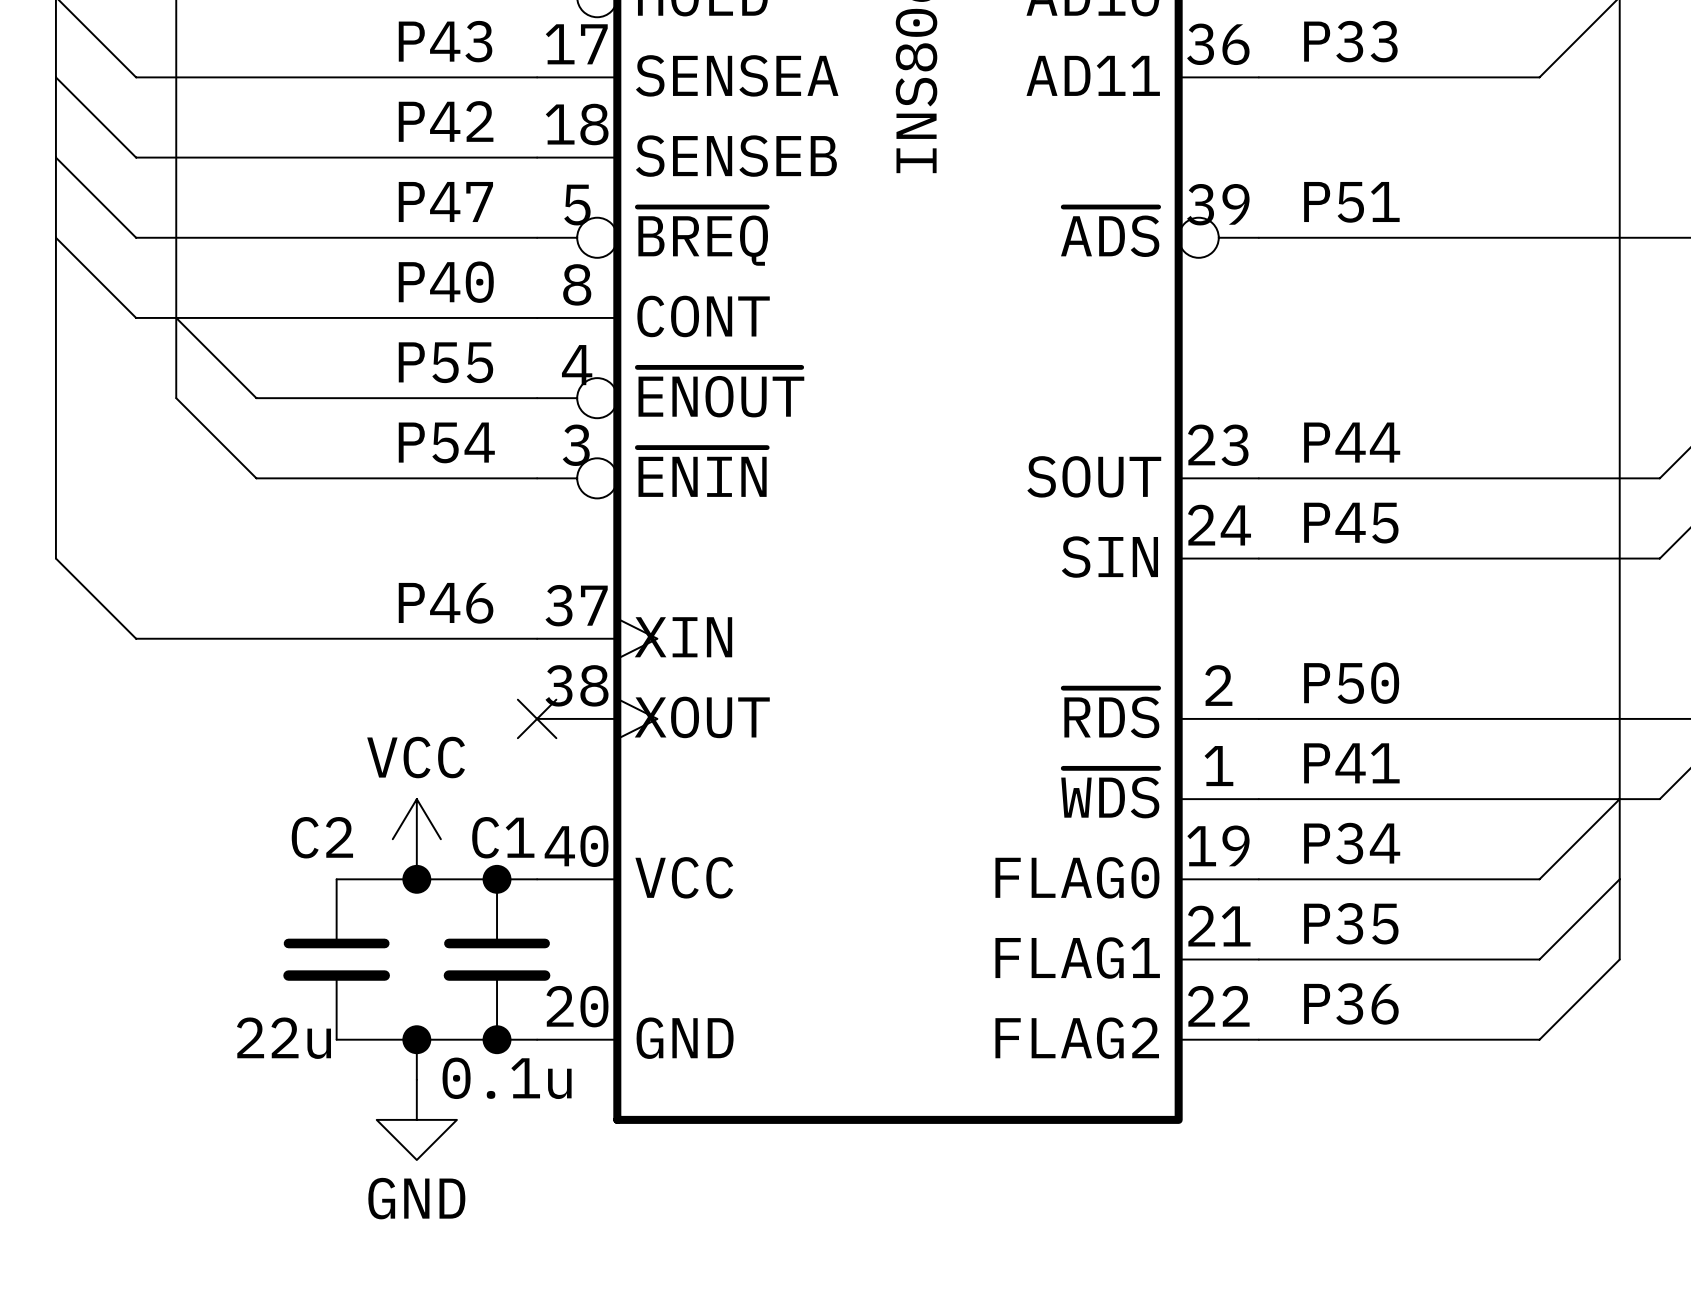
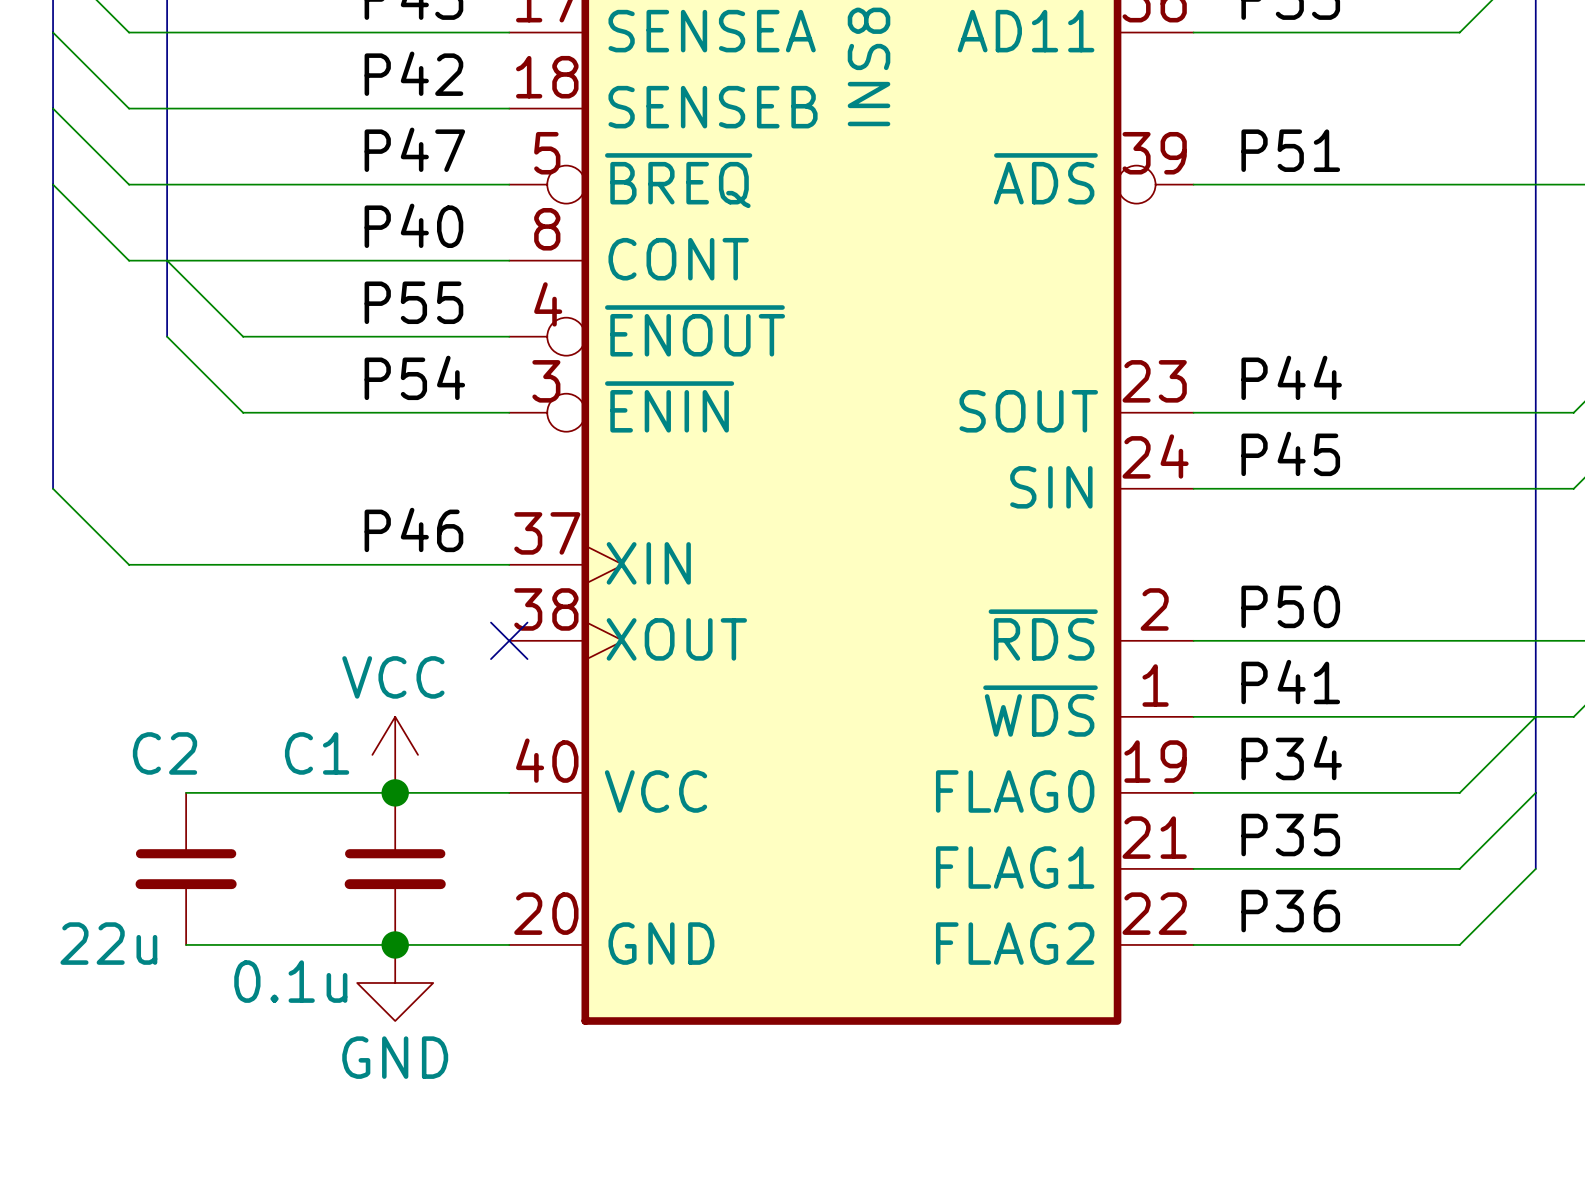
C1 name position: C1 (503, 837) -> C1 (317, 753)
wire: none -> (186, 792) (319, 792)
junction: (497, 879) -> none
C2 position: (336, 959) -> (186, 868)
C1 position: (497, 959) -> (395, 868)
C2 value position: 22u (283, 1038) -> 22u (108, 943)
wire: none -> (186, 944) (319, 944)
junction: (497, 1039) -> none
C1 value position: 0.1u (507, 1078) -> 0.1u (290, 981)
power symbol position: GND (416, 1119) -> GND (395, 982)

